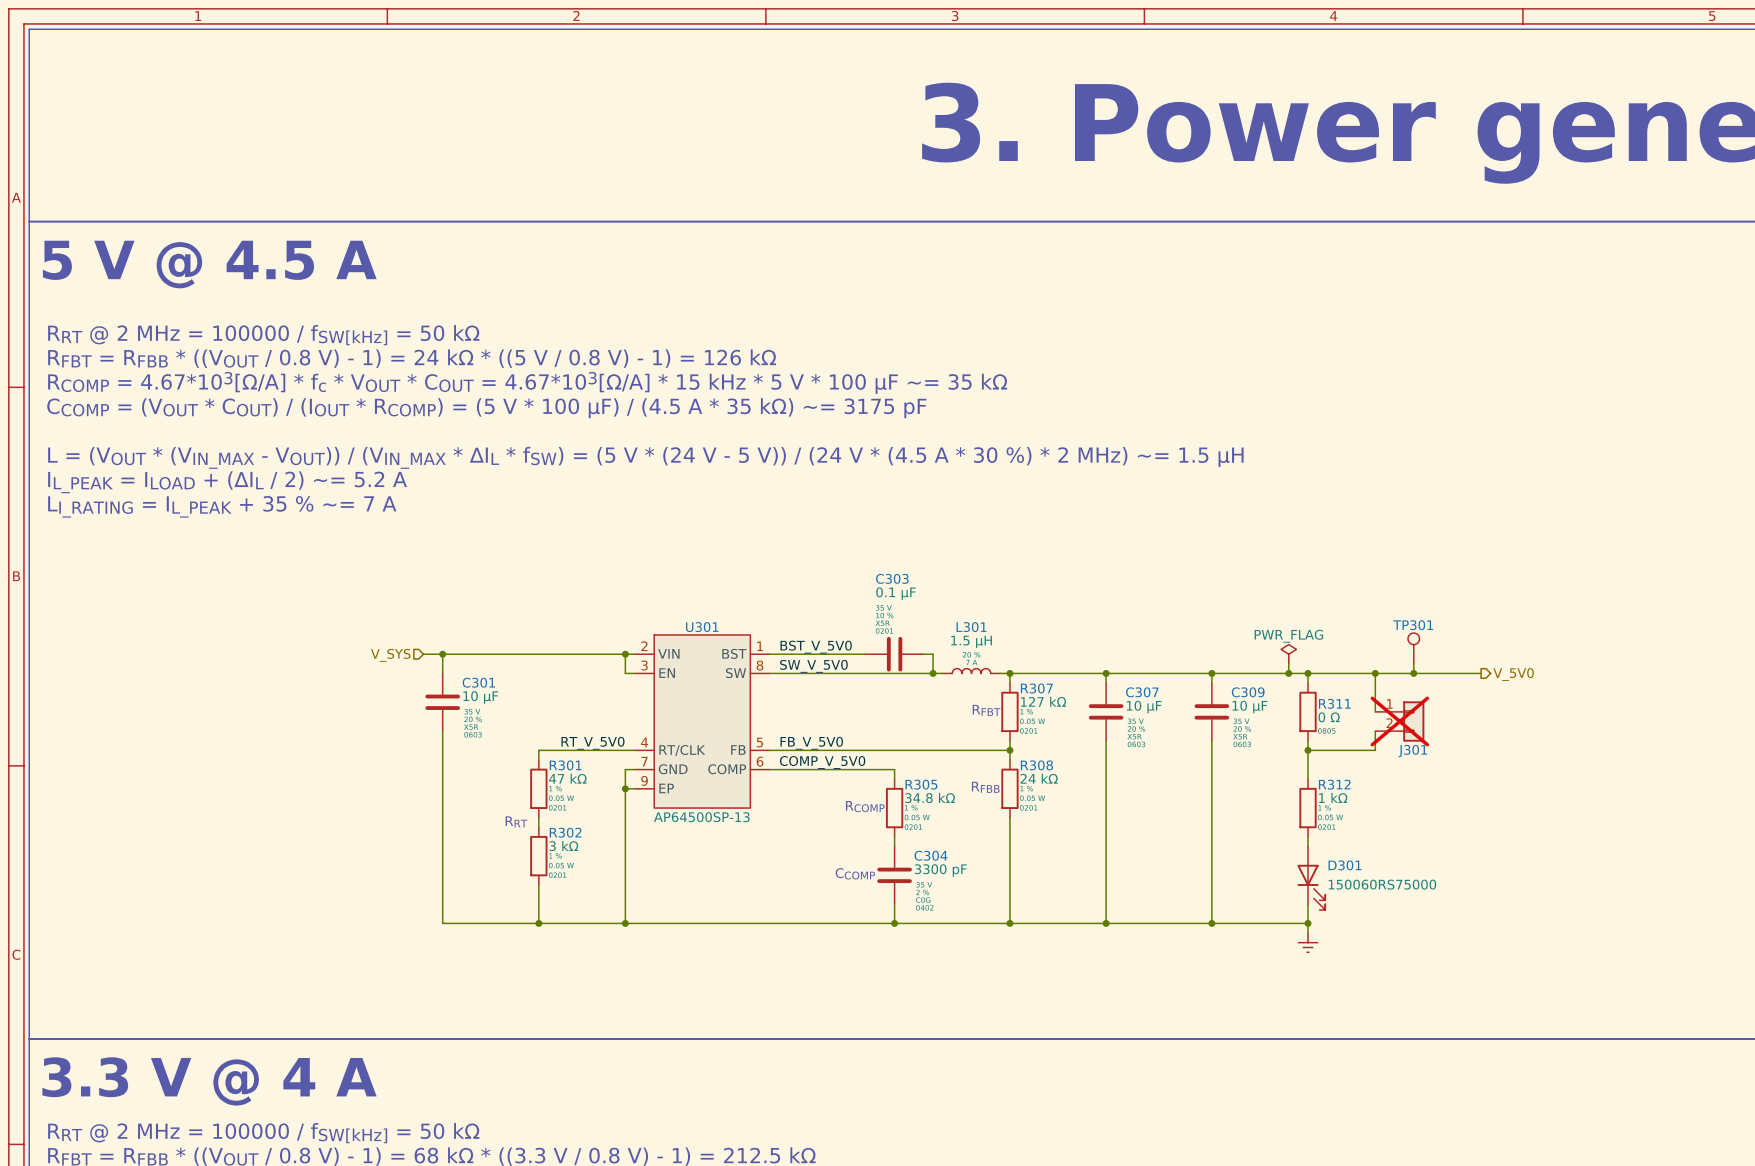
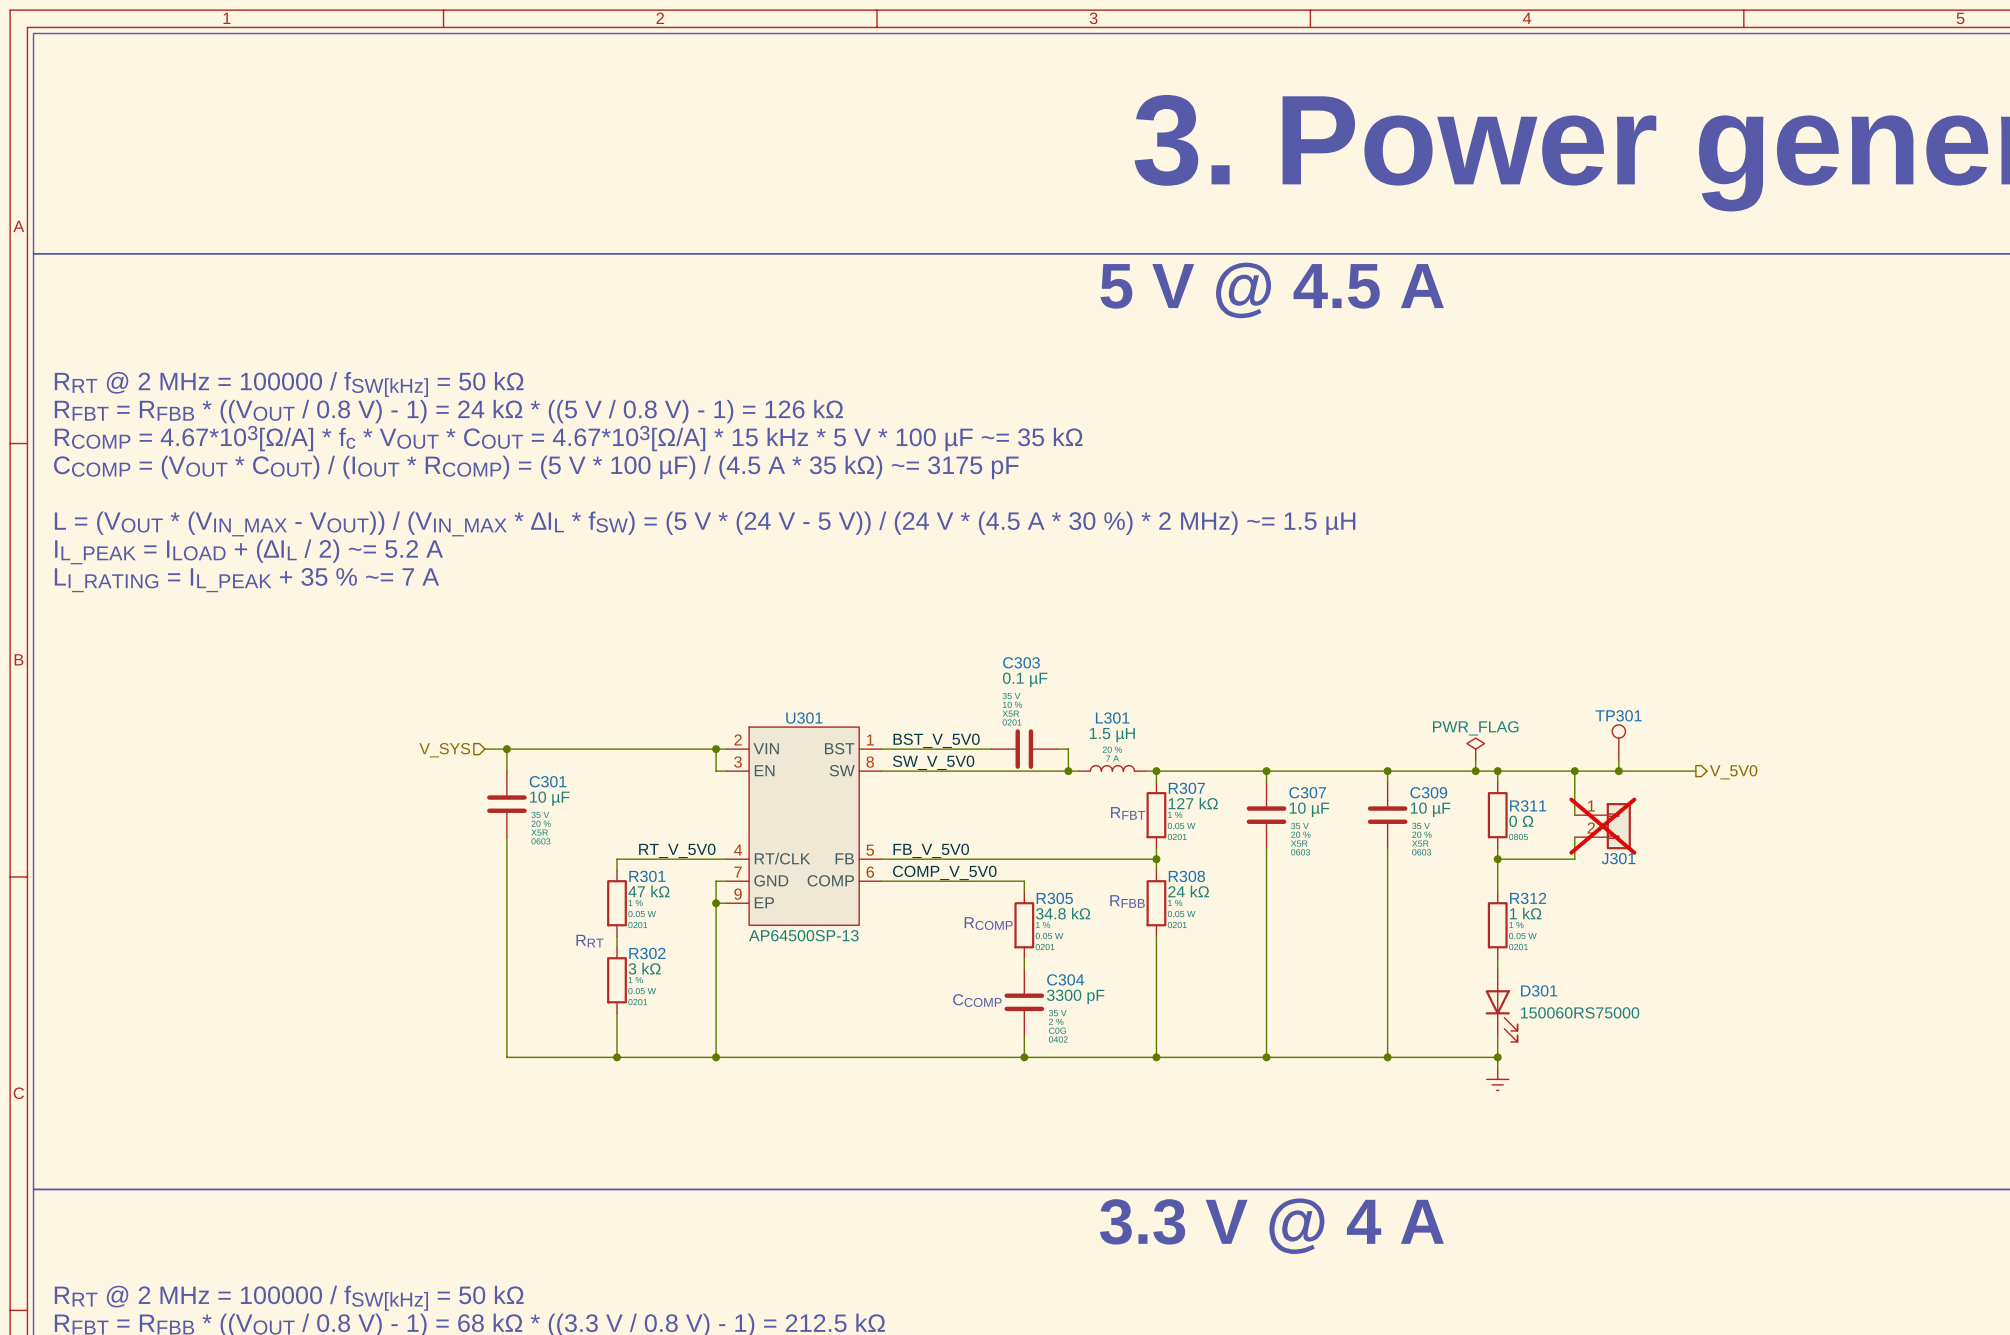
text: none -> 5 V @ 4.5 A (1272, 290)
text: 5 V @ 4.5 A (209, 264) -> none
text: none -> 3.3 V @ 4 A (1271, 1226)
text: 3.3 V @ 4 A (209, 1081) -> none

